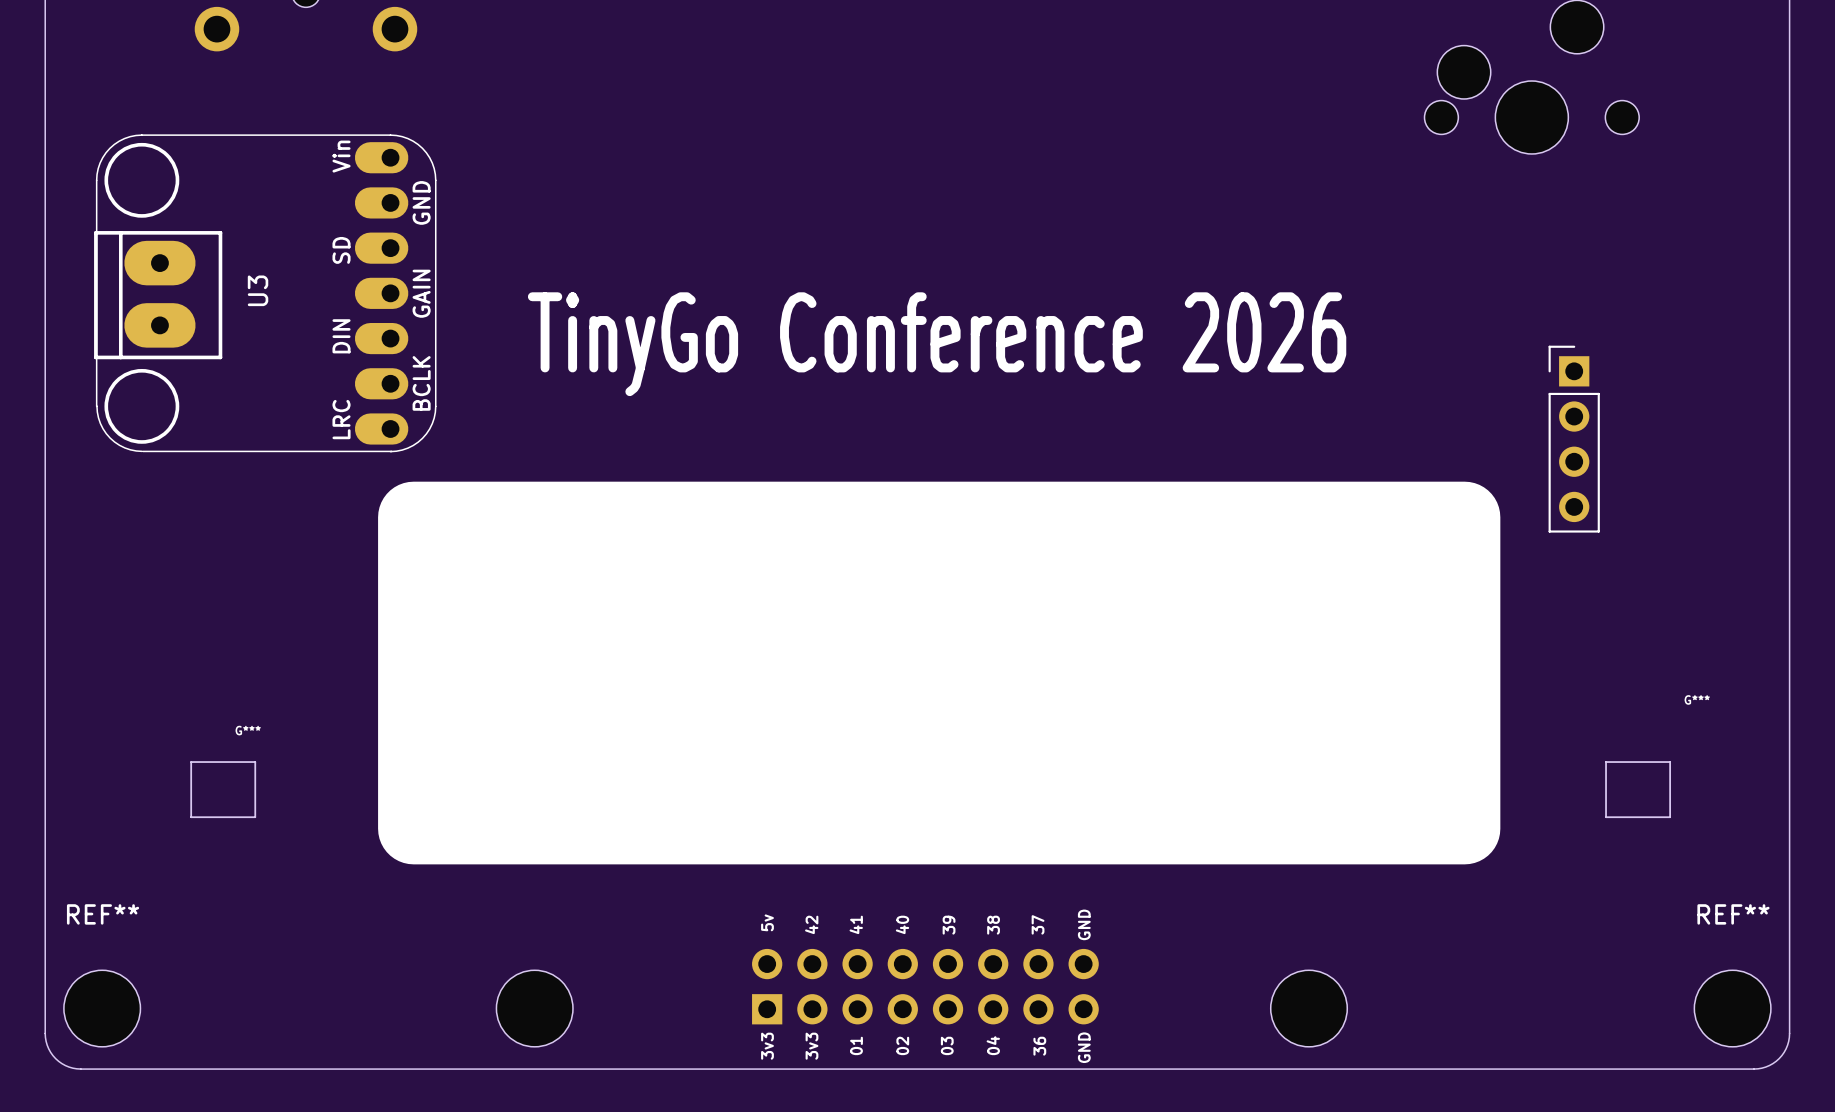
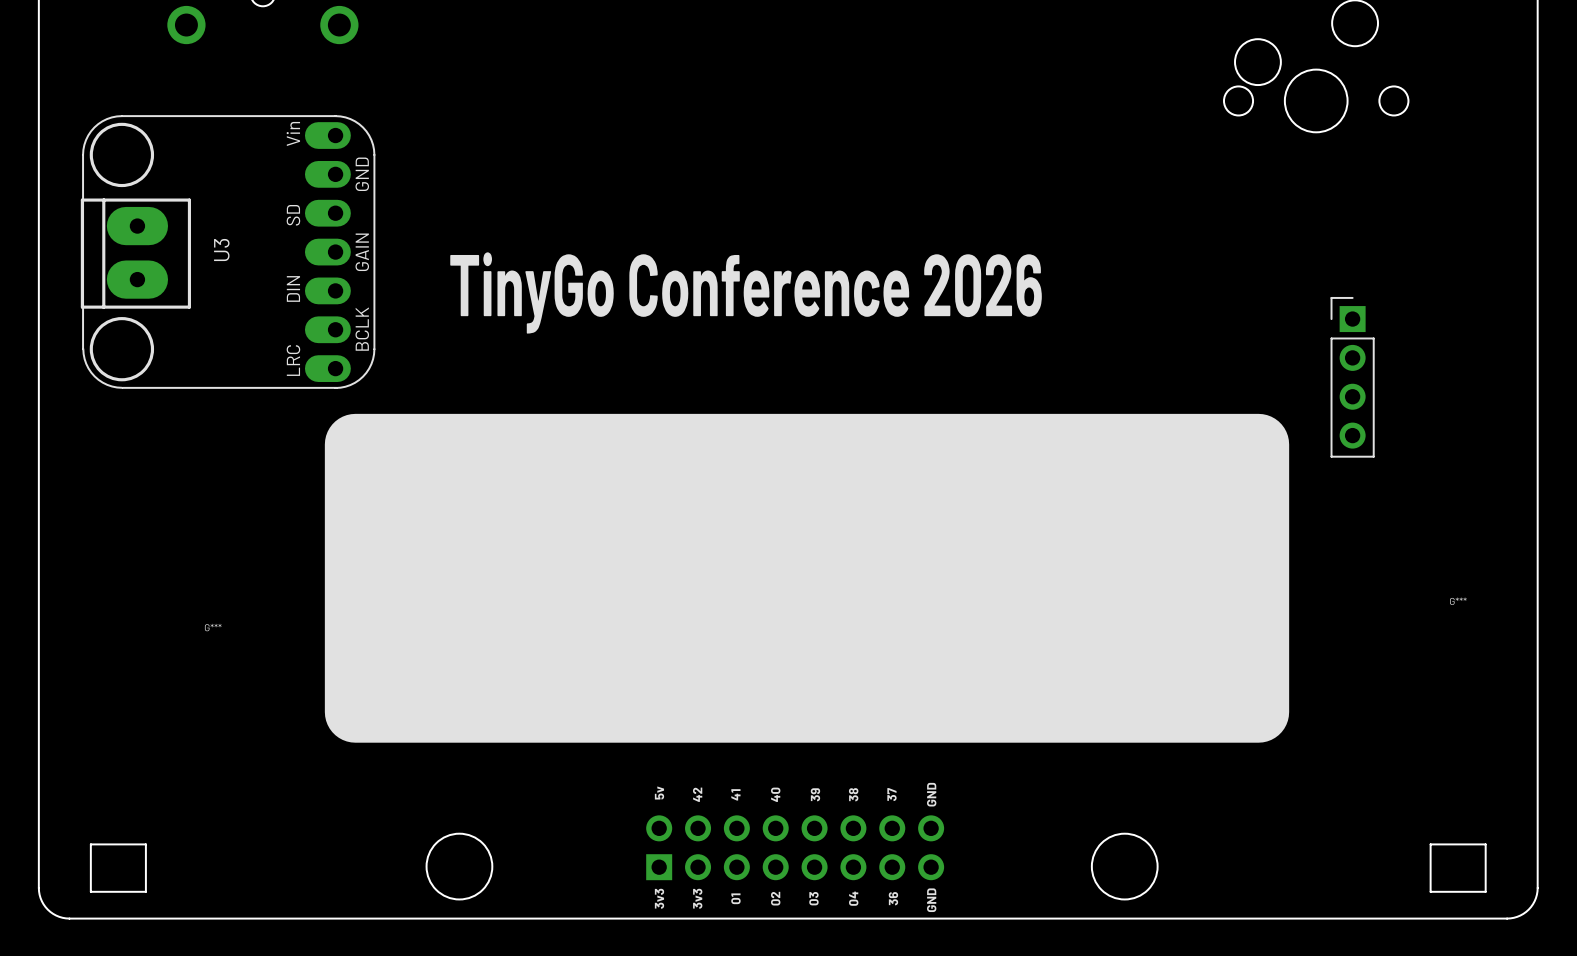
part position: (223, 789) -> (118, 868)
part position: (1638, 789) -> (1458, 868)
REF**: (102, 1008) -> none
REF**: (1732, 1008) -> none

